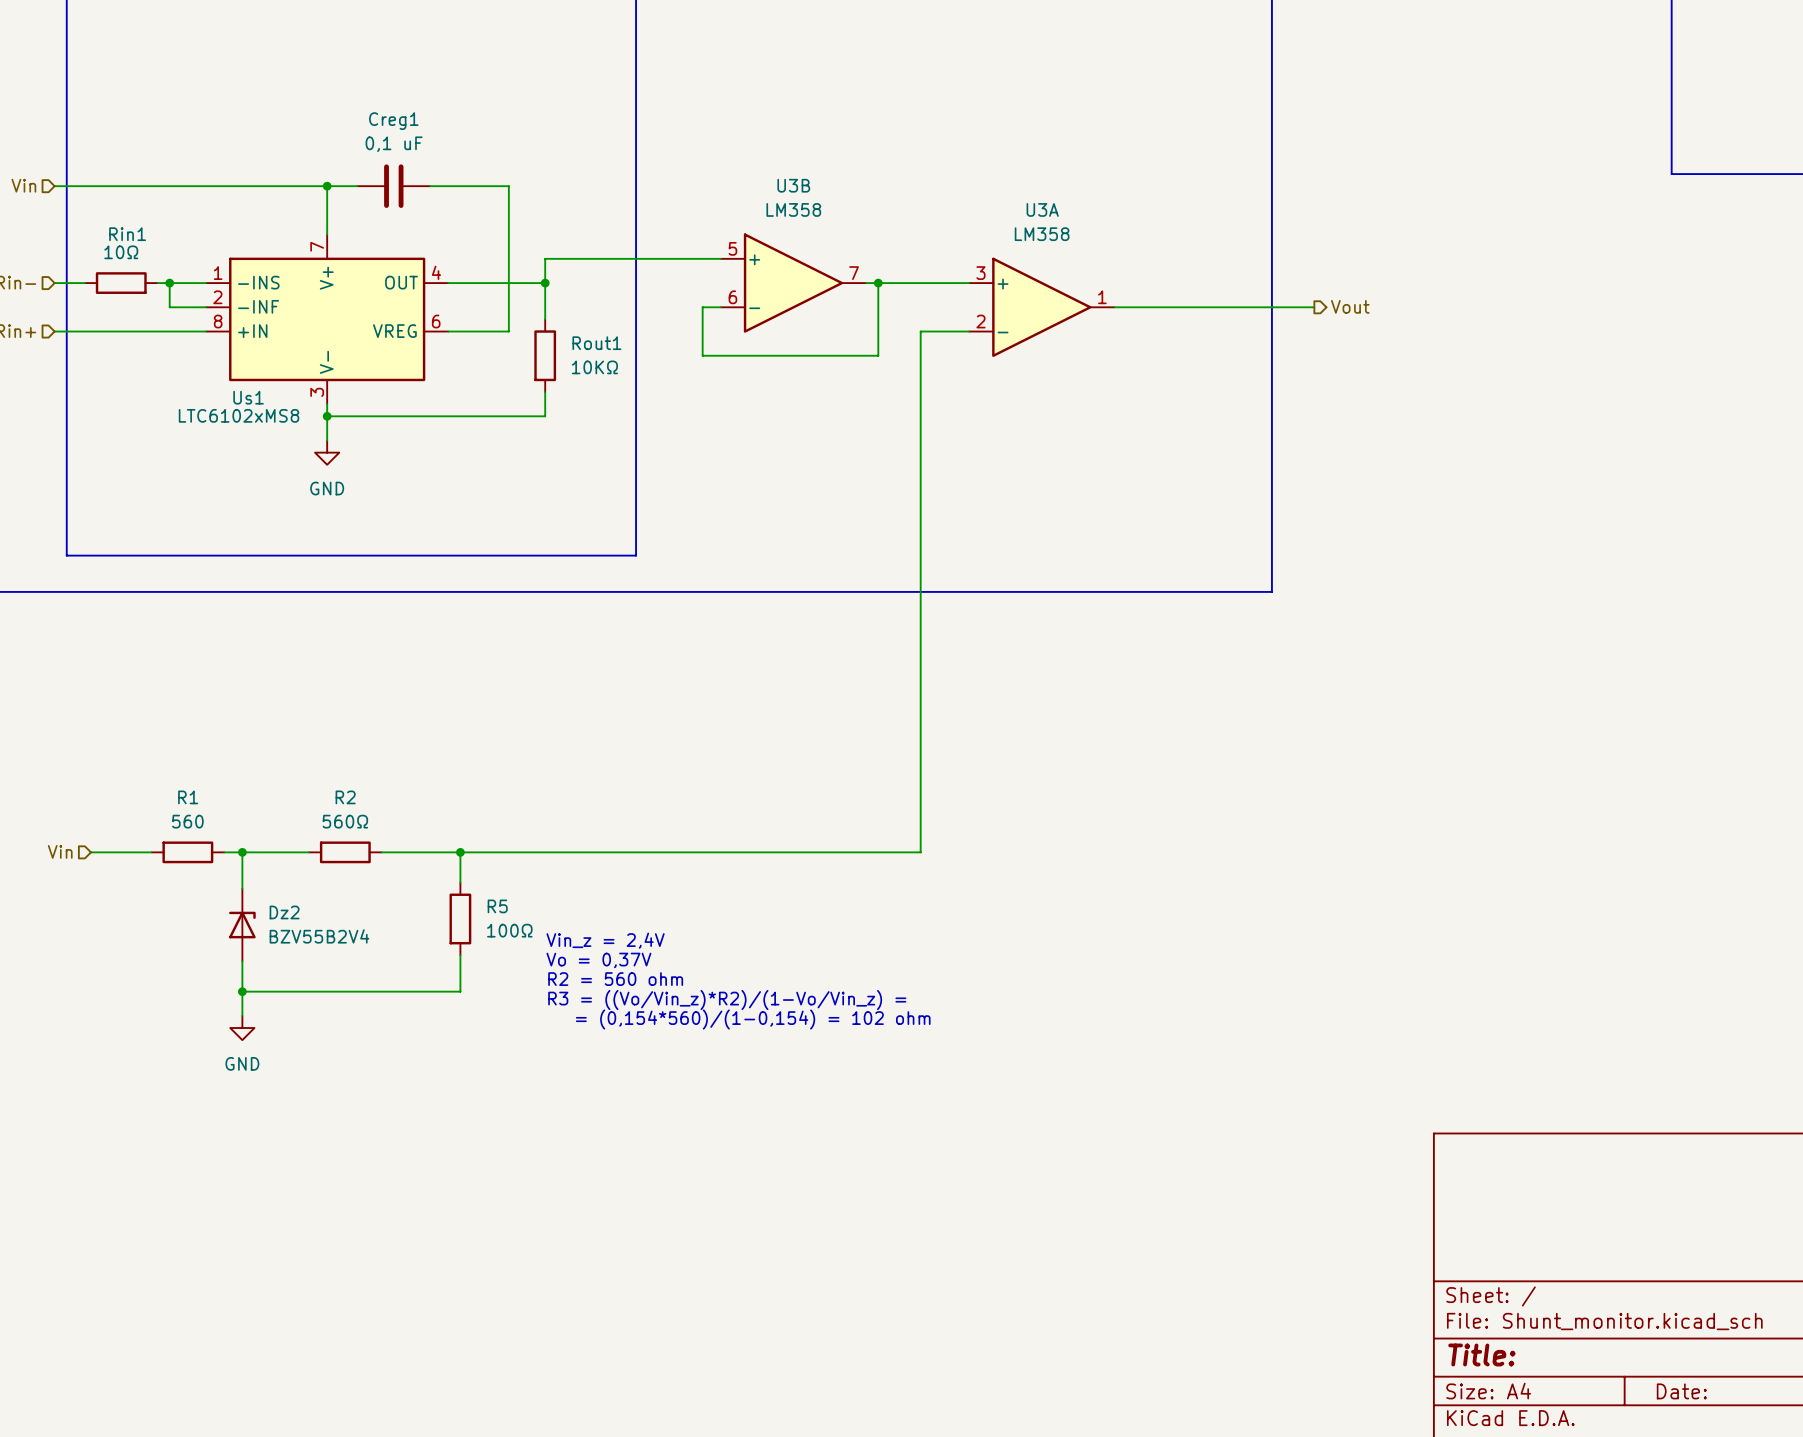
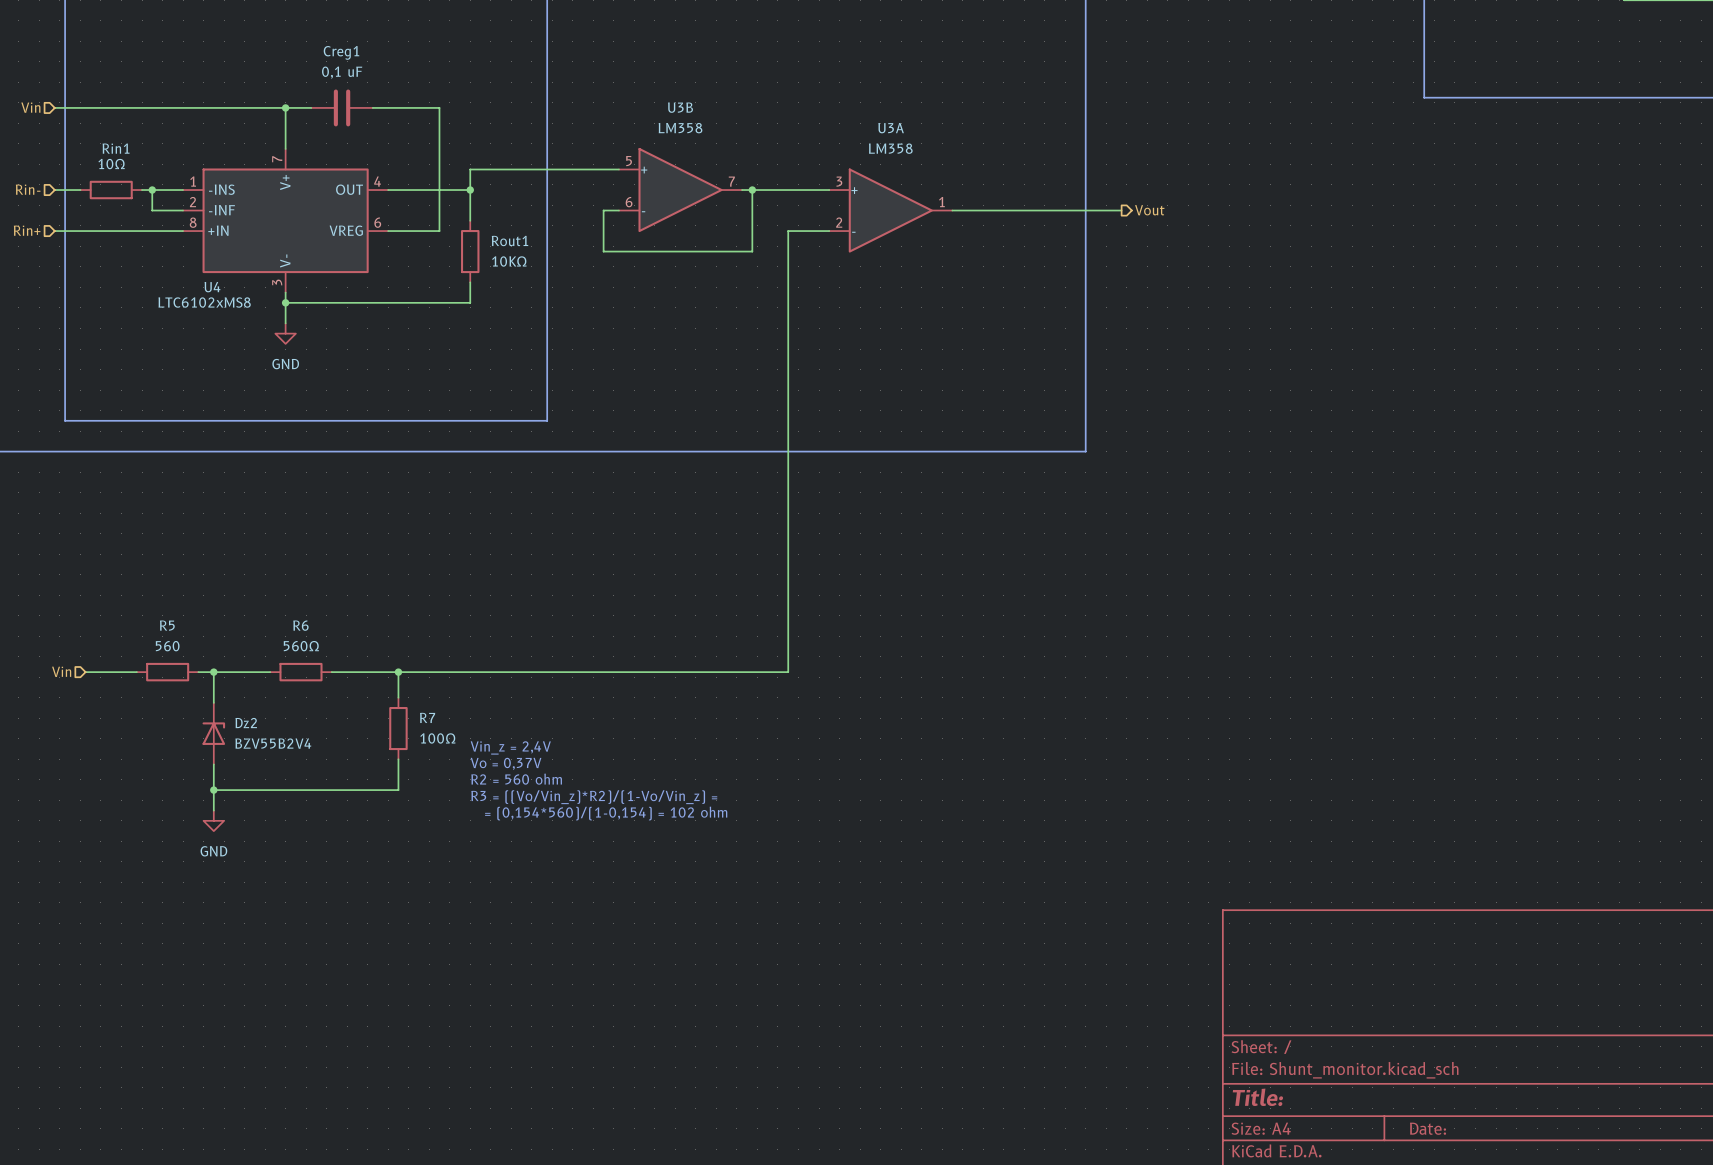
Us1 name: Us1 (248, 397) -> U4 (212, 287)
R1 name: R1 (188, 797) -> R5 (167, 625)
R2 name: R2 (345, 797) -> R6 (300, 625)
R5 name: R5 (497, 906) -> R7 (427, 717)

